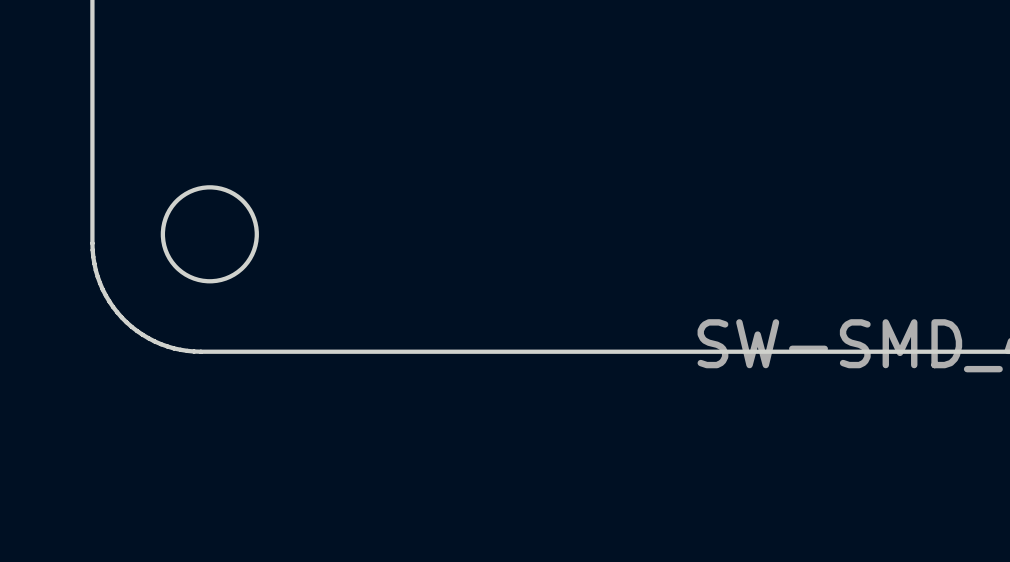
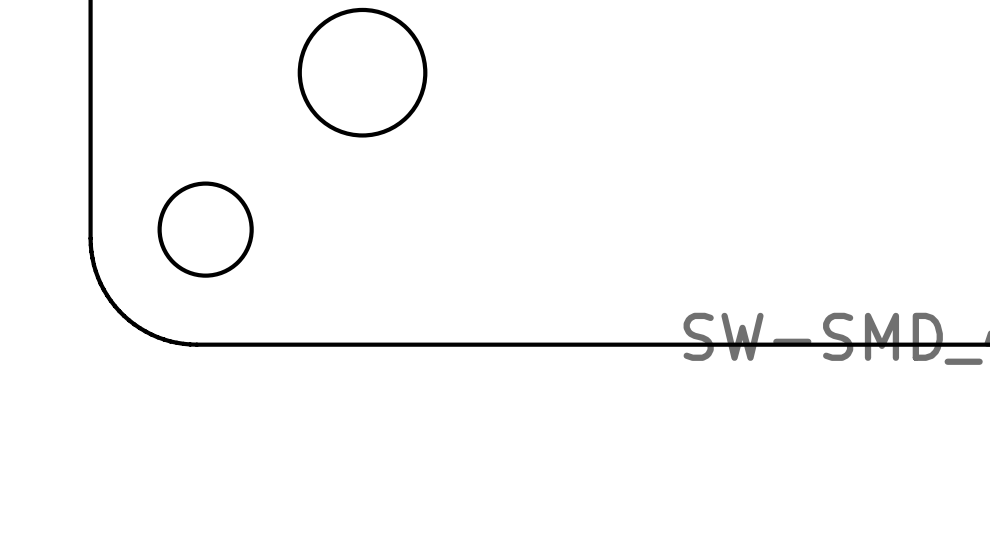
round board edge: none -> [297, 7, 428, 138]

